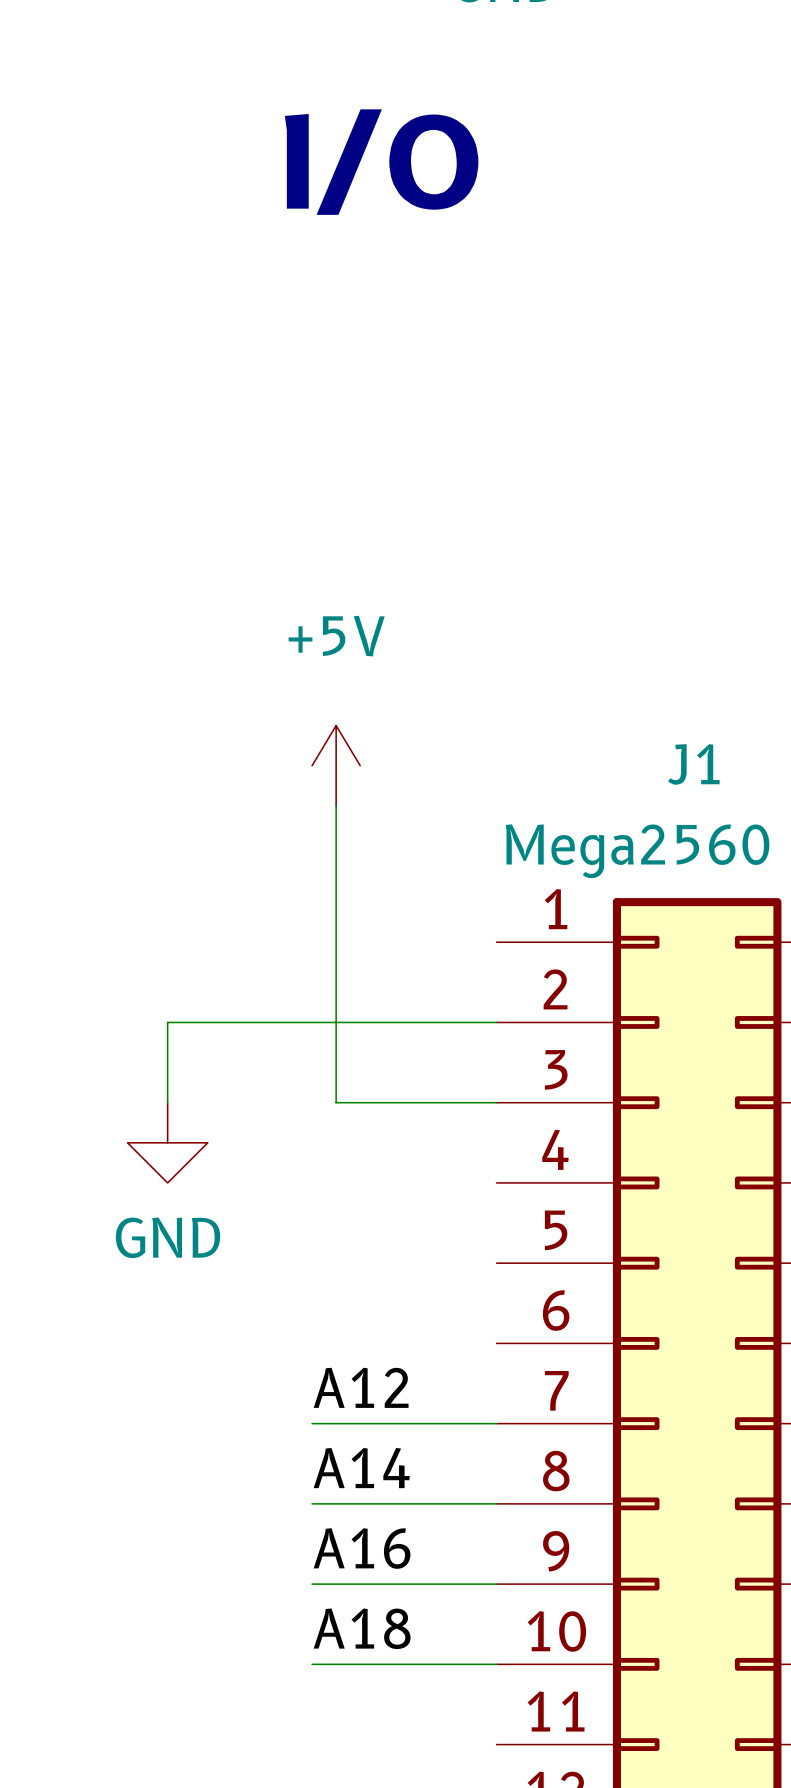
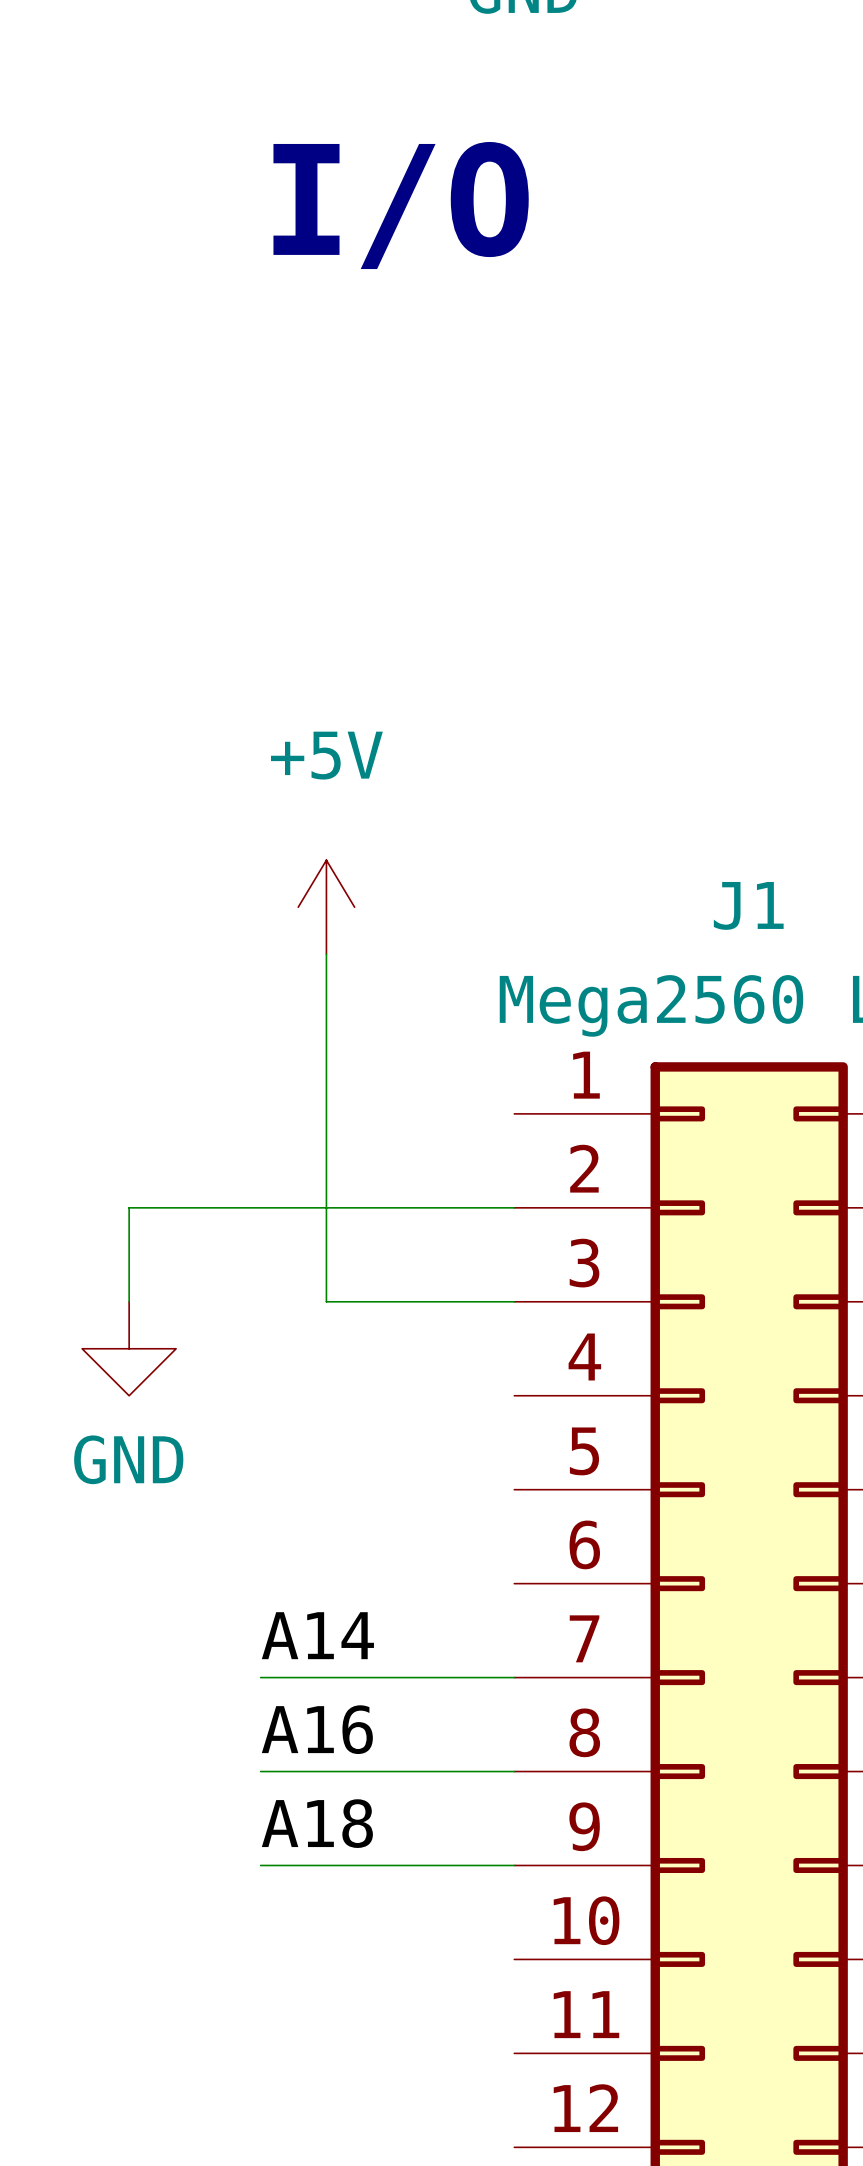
label: A12 (361, 1387) -> none
wire: none -> (260, 1677) (298, 1677)
label position: A14 (361, 1468) -> A14 (317, 1635)
wire: none -> (260, 1771) (298, 1771)
label position: A16 (362, 1548) -> A16 (317, 1729)
wire: none -> (260, 1865) (298, 1865)
label position: A18 (362, 1628) -> A18 (317, 1823)
wire: (312, 1664) (496, 1664) -> none

